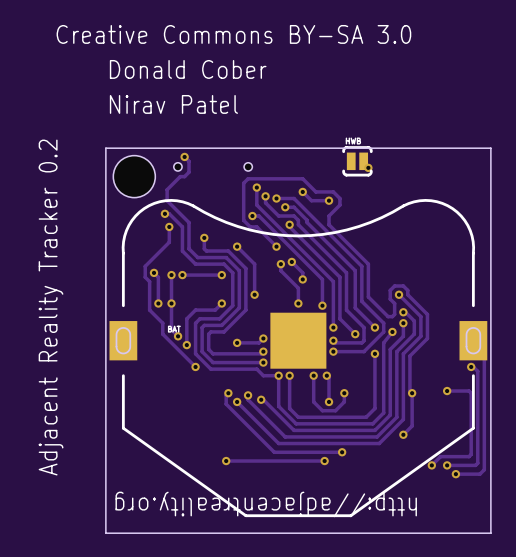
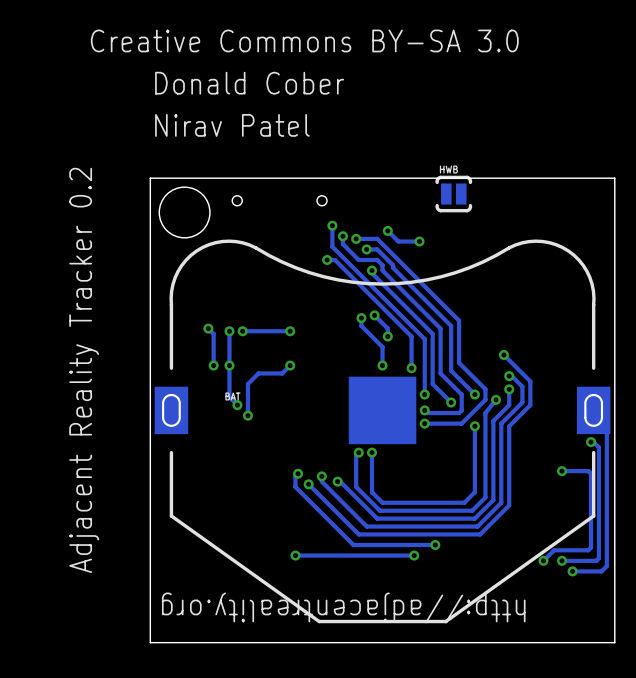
track: (184, 156) (189, 161) (189, 172) (184, 176) (180, 176) (167, 189) (167, 200) (189, 222) (189, 248) (197, 257) (226, 257) (239, 270) (239, 307) (221, 325) (204, 325) (202, 327) (202, 351) (213, 362) (263, 362) -> none
via: (184, 156) -> none
via: (368, 167) -> none
track: (164, 213) (169, 213) (182, 226) (182, 251) (195, 264) (224, 264) (232, 272) (232, 305) (219, 318) (199, 318) (195, 323) (195, 353) (210, 369) (256, 369) (263, 375) (278, 375) (278, 406) -> (356, 452) (356, 486) (358, 489)
via: (164, 213) -> none
track: (169, 226) (169, 242) (145, 266) (145, 277) (149, 281) (149, 310) (162, 323) (162, 334) (195, 366) -> none
via: (169, 226) -> none
track: (204, 237) (204, 248) (206, 251) (228, 251) (245, 268) (245, 310) (224, 331) (210, 331) (208, 334) (208, 349) (213, 353) (261, 353) (263, 351) -> none
via: (204, 237) -> none
track: (237, 246) (254, 264) (254, 294) -> none
via: (237, 246) -> none
track: (276, 246) (256, 226) (250, 226) (243, 220) (243, 183) (248, 178) (302, 178) (315, 191) (333, 191) (339, 198) (339, 205) (329, 216) (329, 224) (368, 264) (368, 296) (388, 316) (392, 316) (394, 314) (394, 303) (390, 299) (390, 290) (394, 286) (403, 286) (407, 290) (407, 294) (427, 314) (427, 338) (409, 356) (412, 426) (403, 434) -> none
via: (276, 246) -> none
via: (254, 294) -> none
track: (263, 338) (259, 342) (237, 342) -> none
via: (263, 338) -> none
via: (237, 342) -> none
via: (263, 351) -> none
via: (263, 362) -> none
via: (195, 366) -> none
track: (313, 375) (313, 401) (322, 410) (335, 410) (344, 401) (344, 393) -> none
via: (313, 375) -> none
track: (326, 375) (329, 377) (329, 401) -> none
via: (326, 375) -> none
via: (344, 393) -> none
via: (412, 393) -> none
via: (329, 401) -> none
via: (403, 434) -> none

